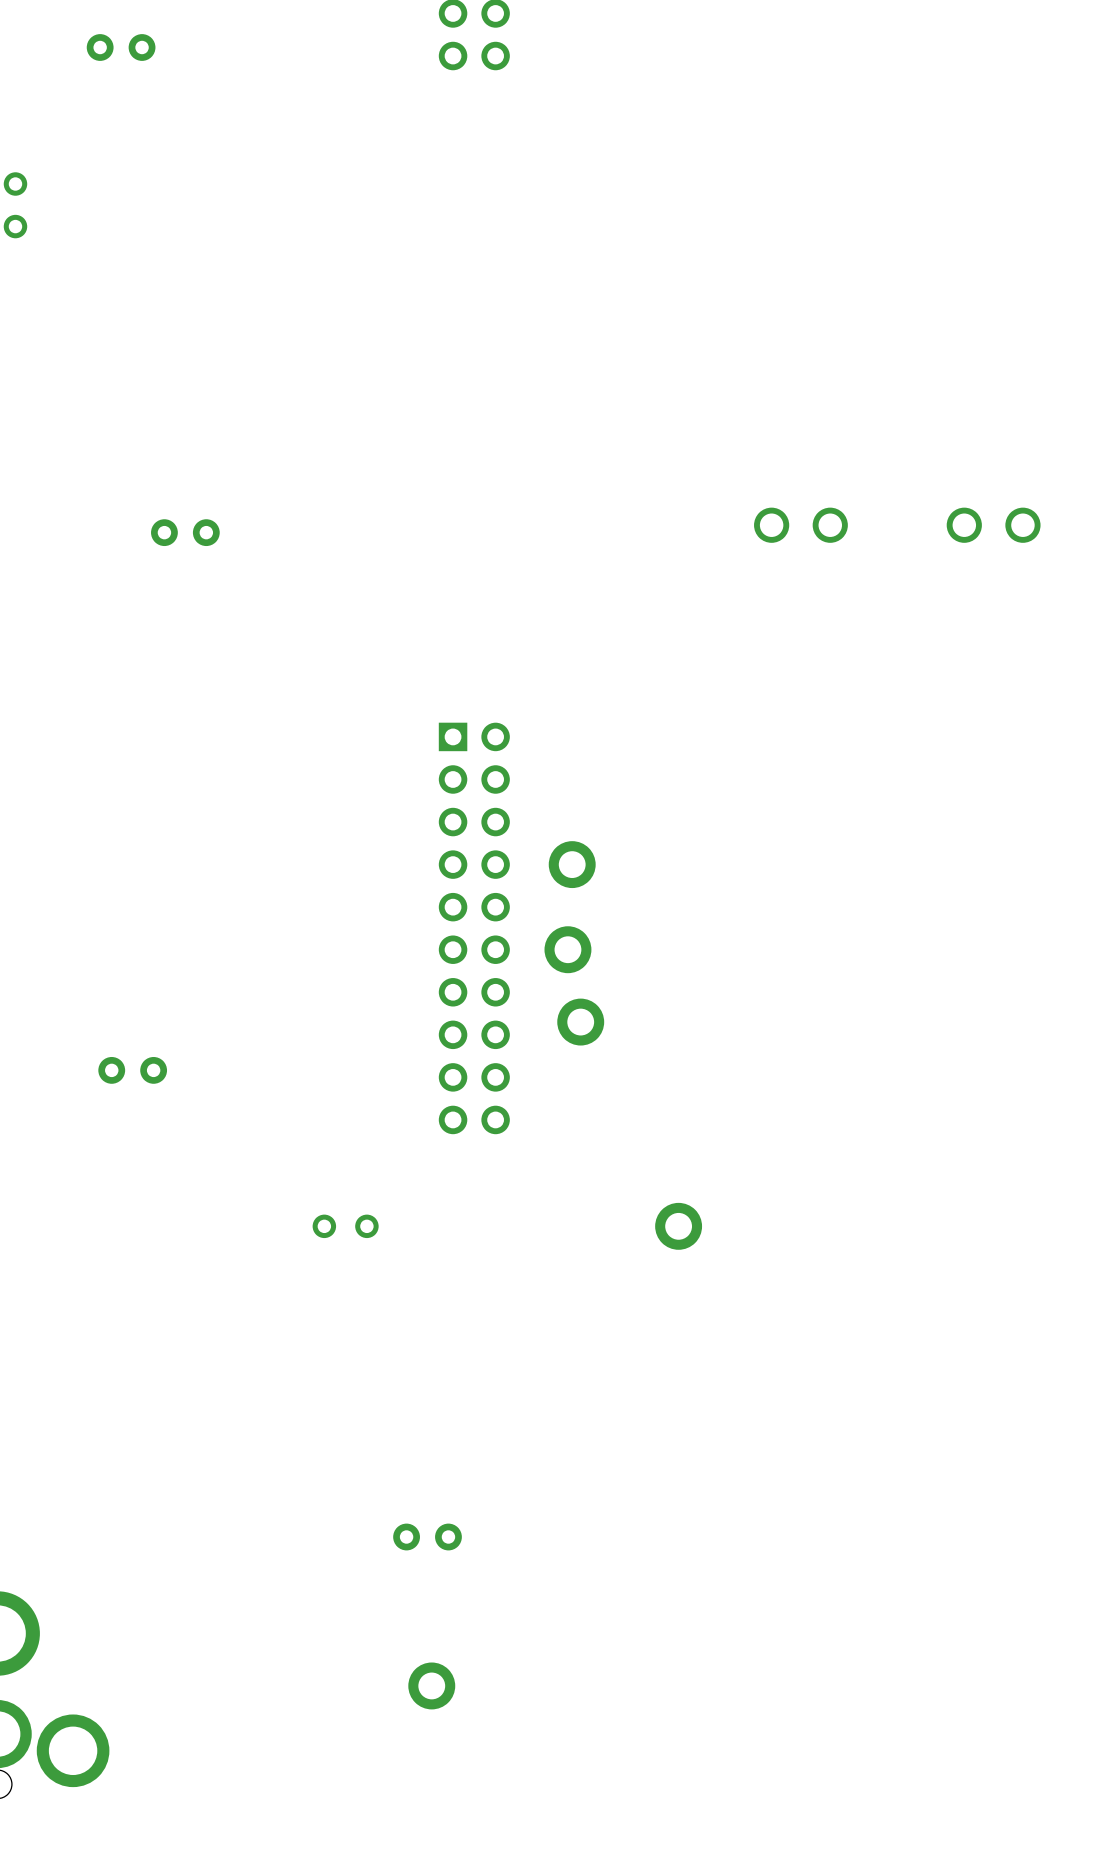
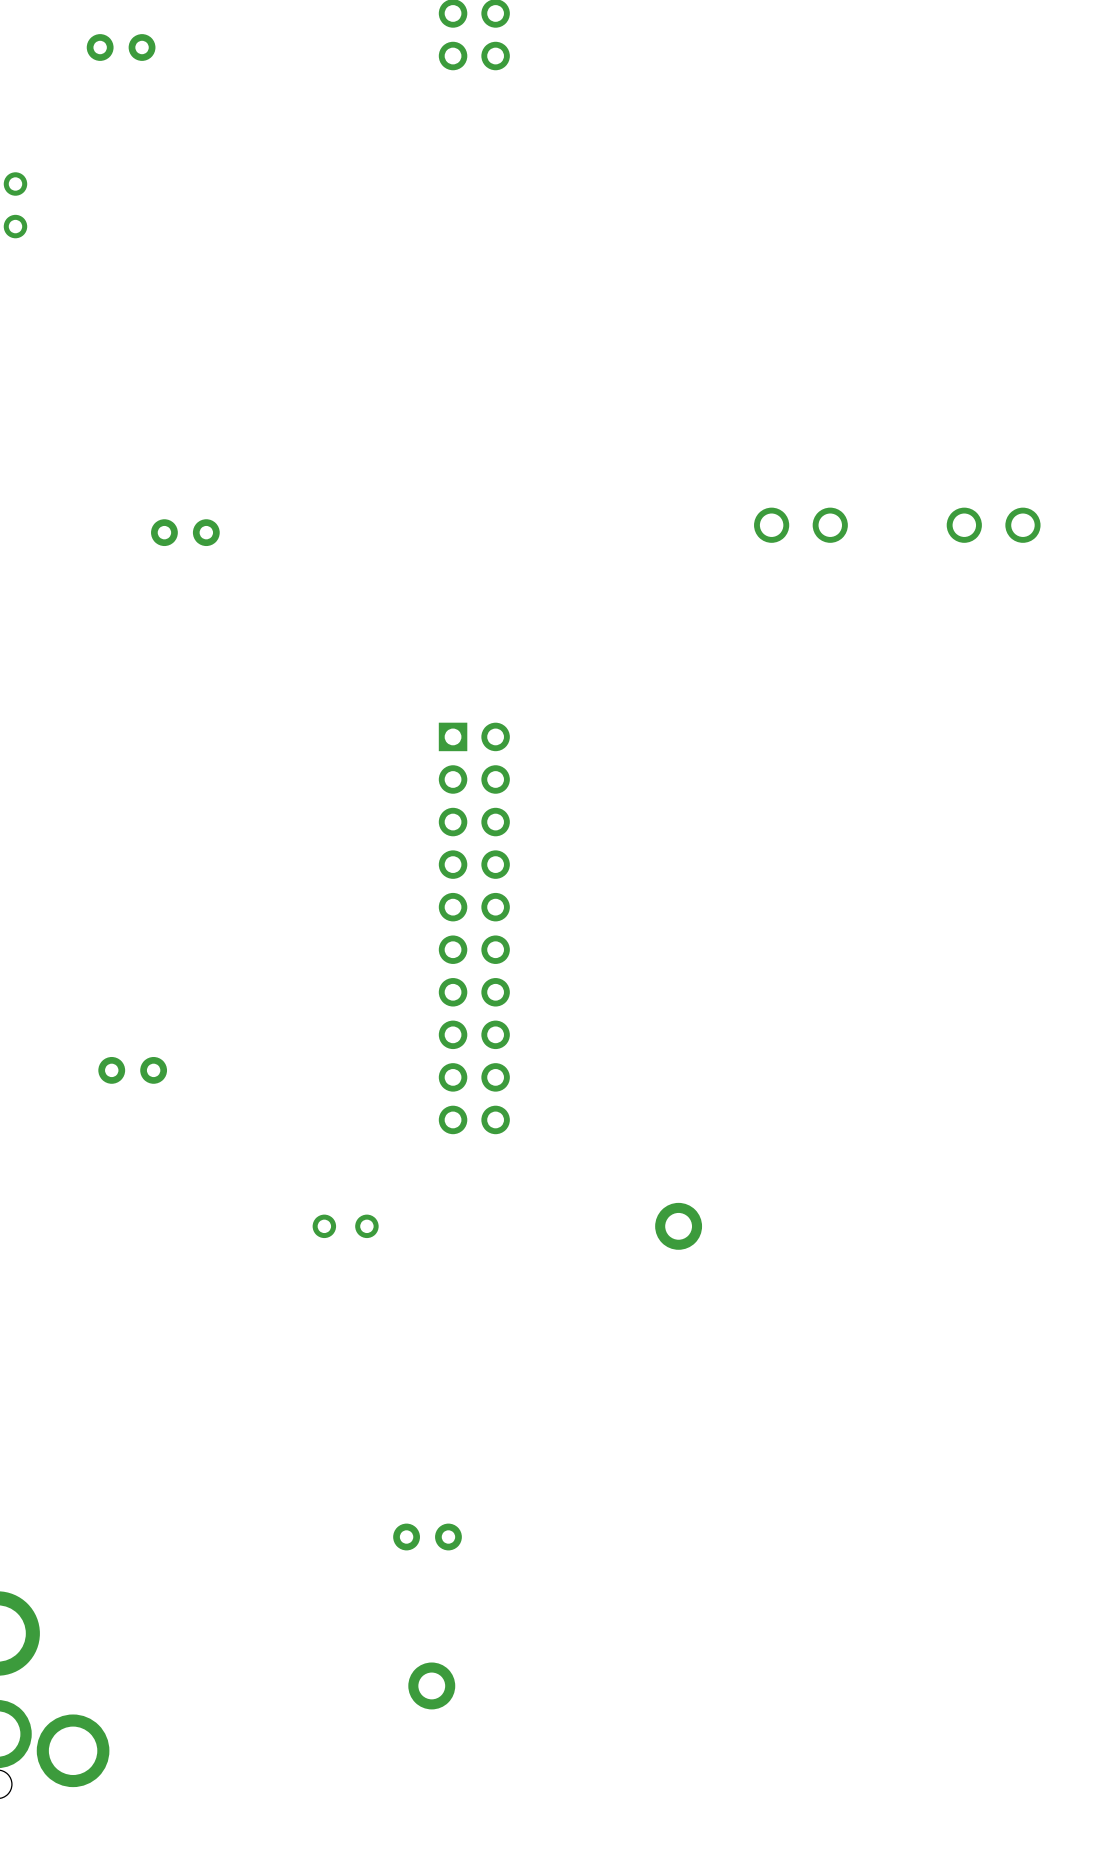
part: (572, 864) -> none
part: (567, 949) -> none
part: (580, 1022) -> none

